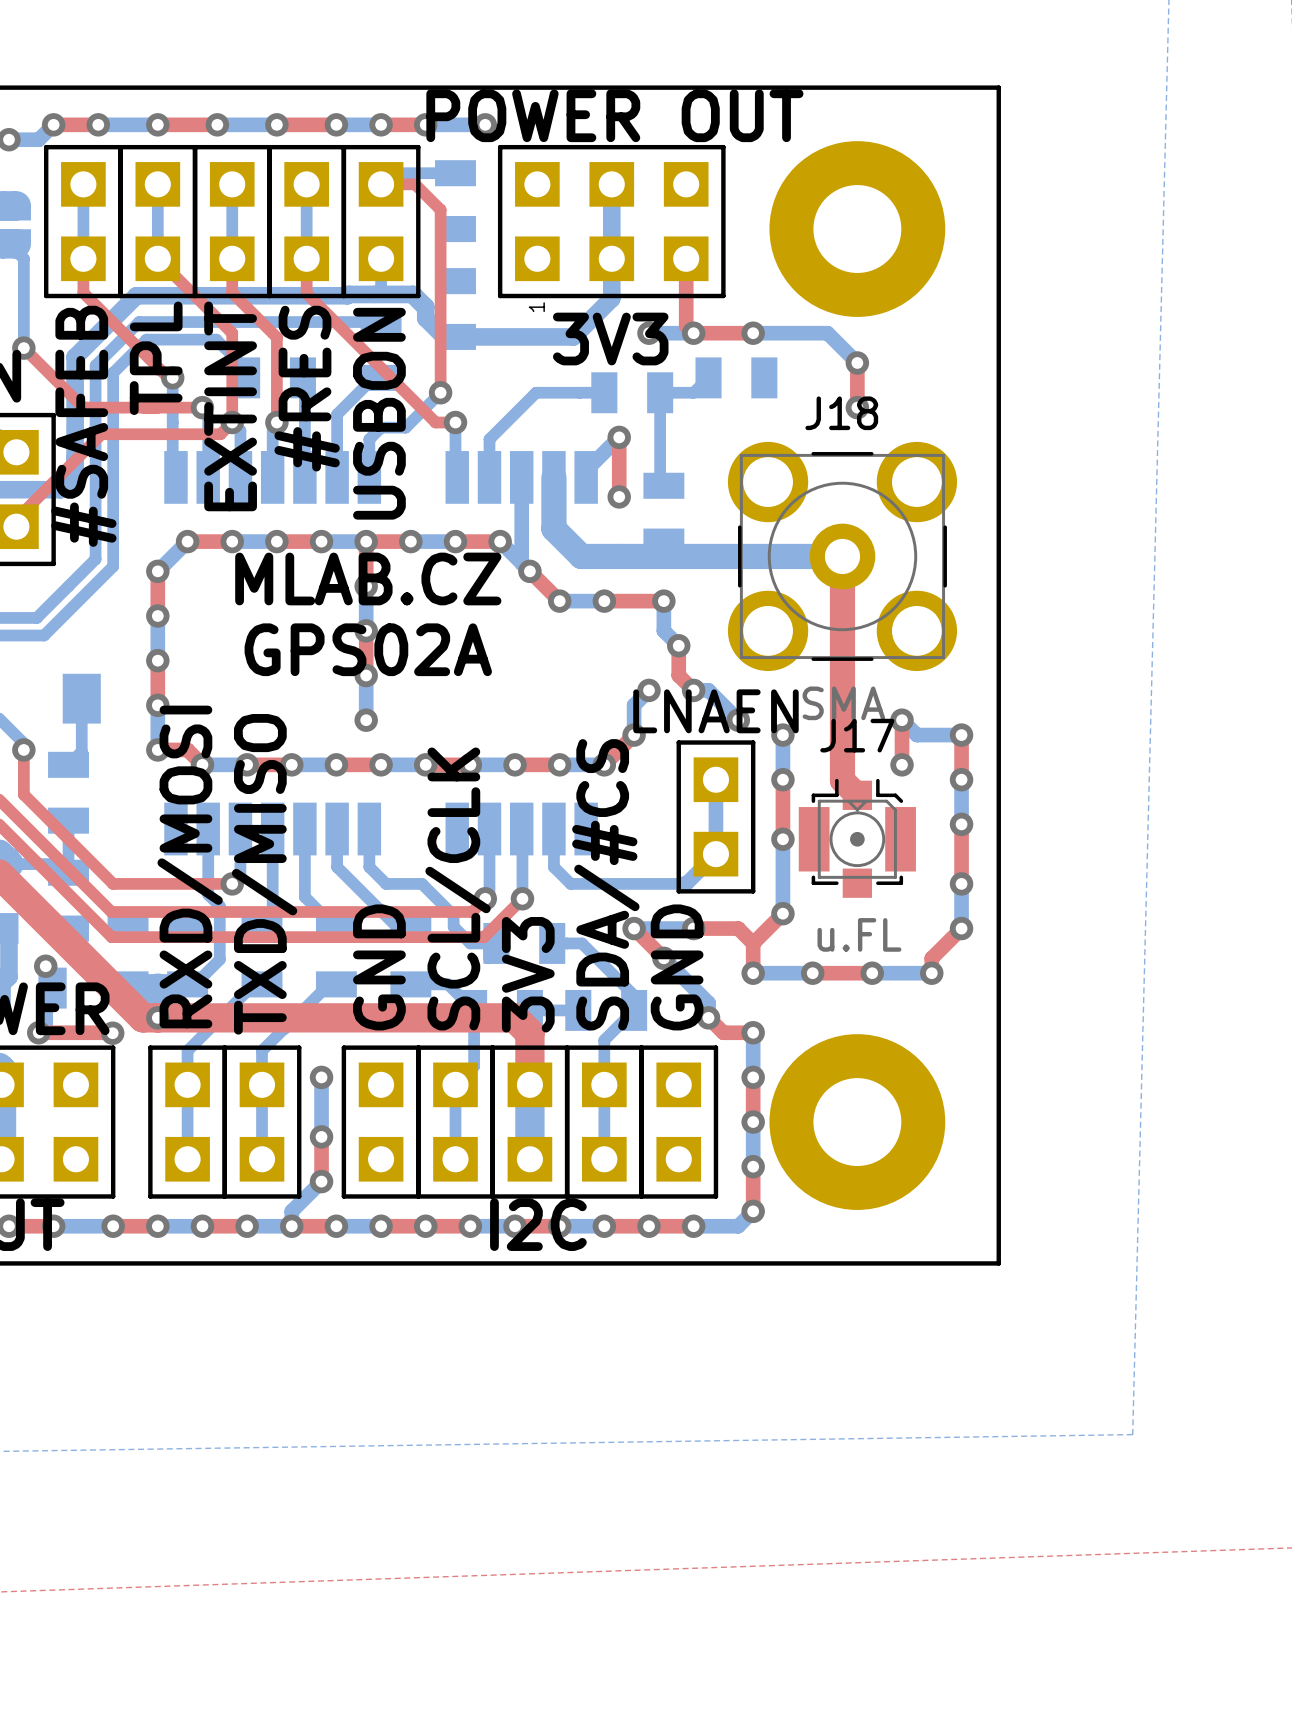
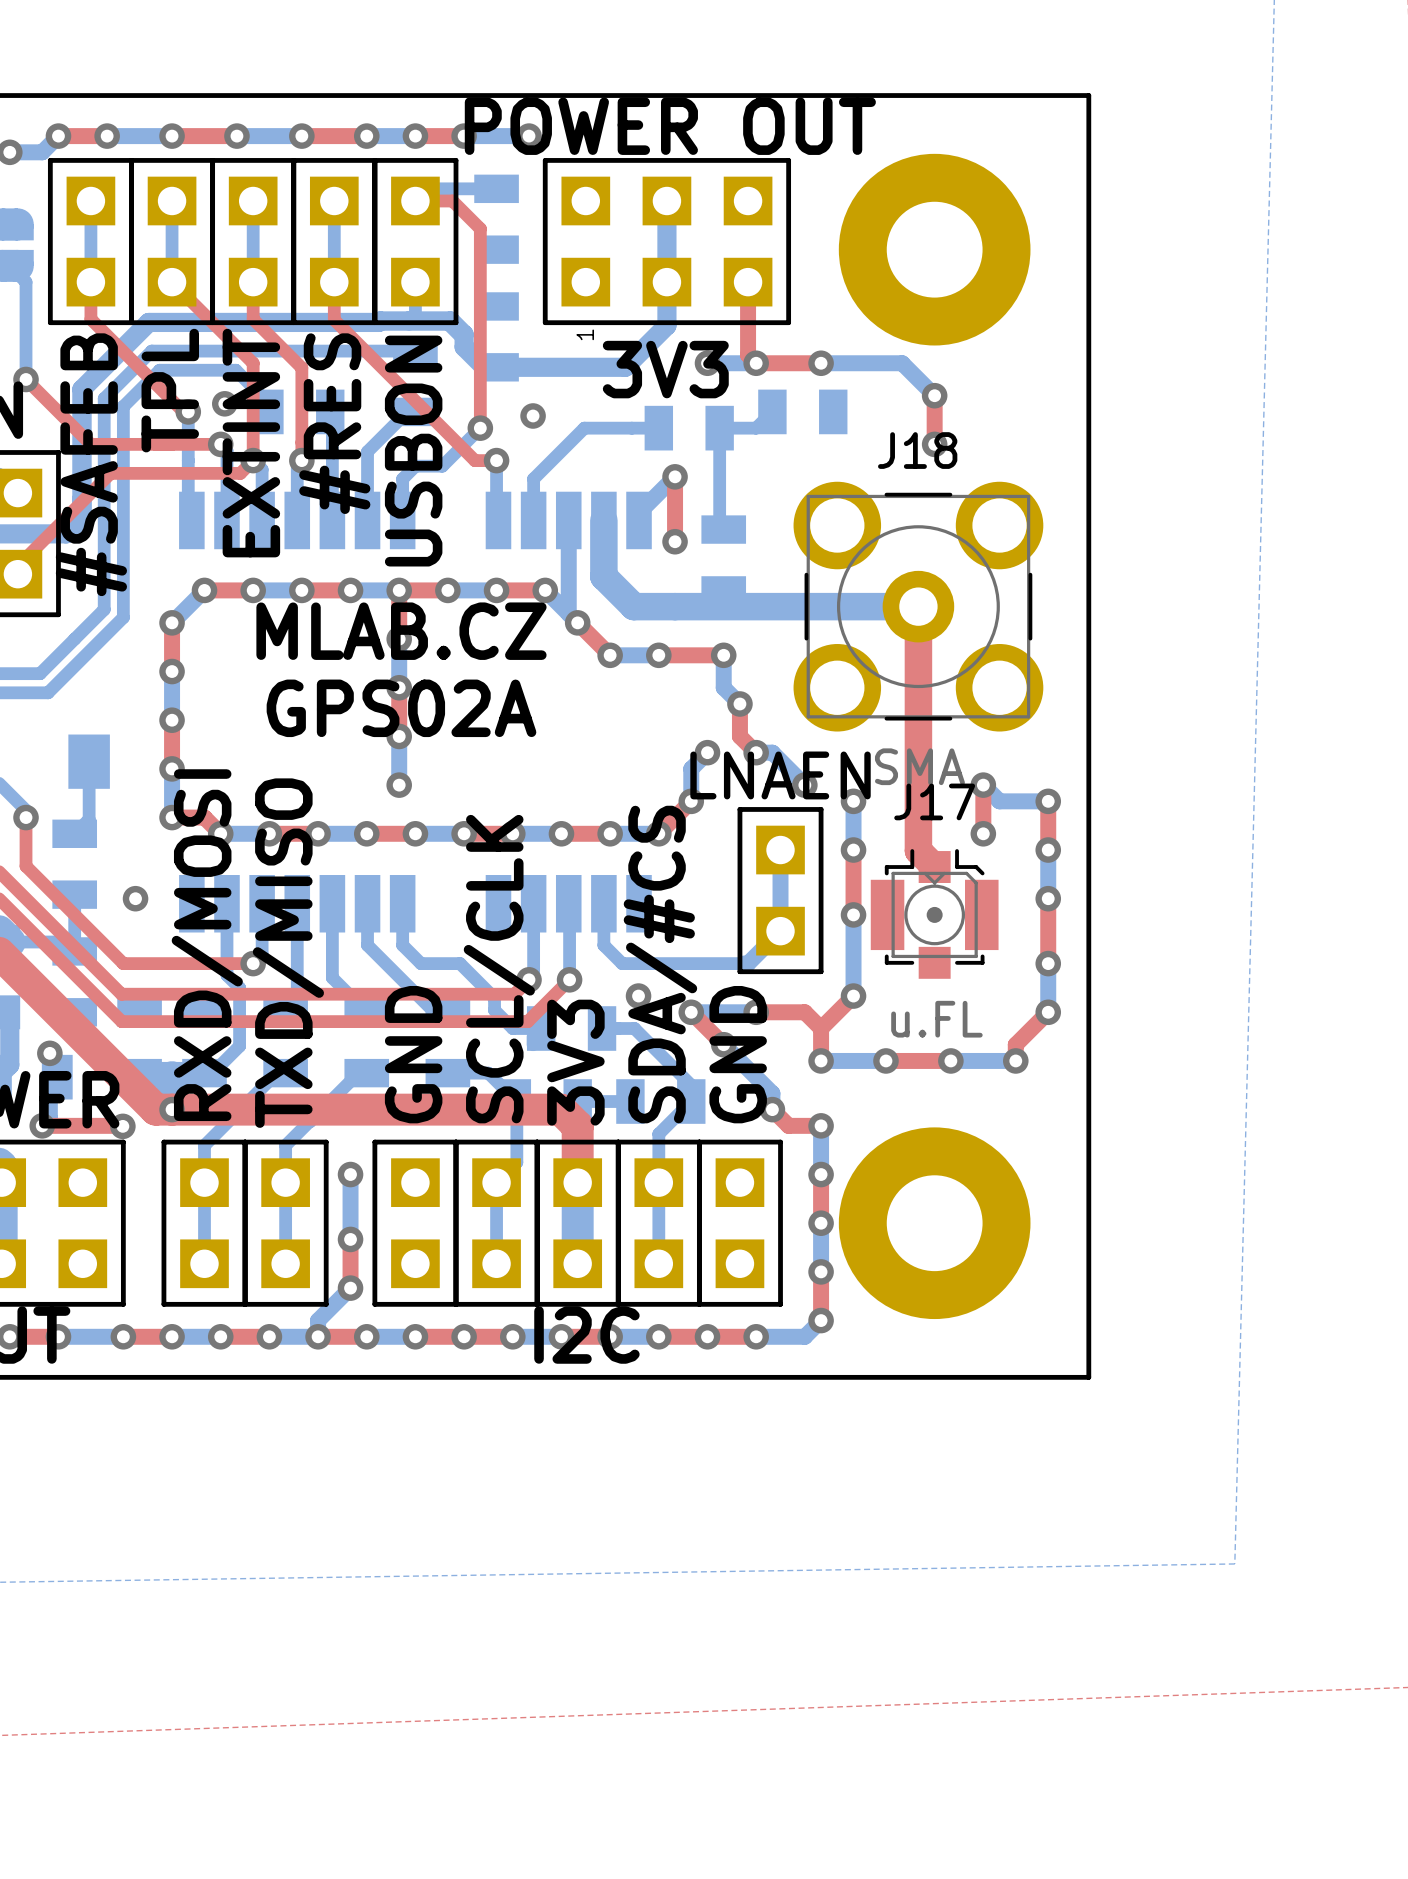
via: none -> (224, 403)
via: none -> (533, 415)
via: none -> (135, 898)
via: none -> (638, 996)

